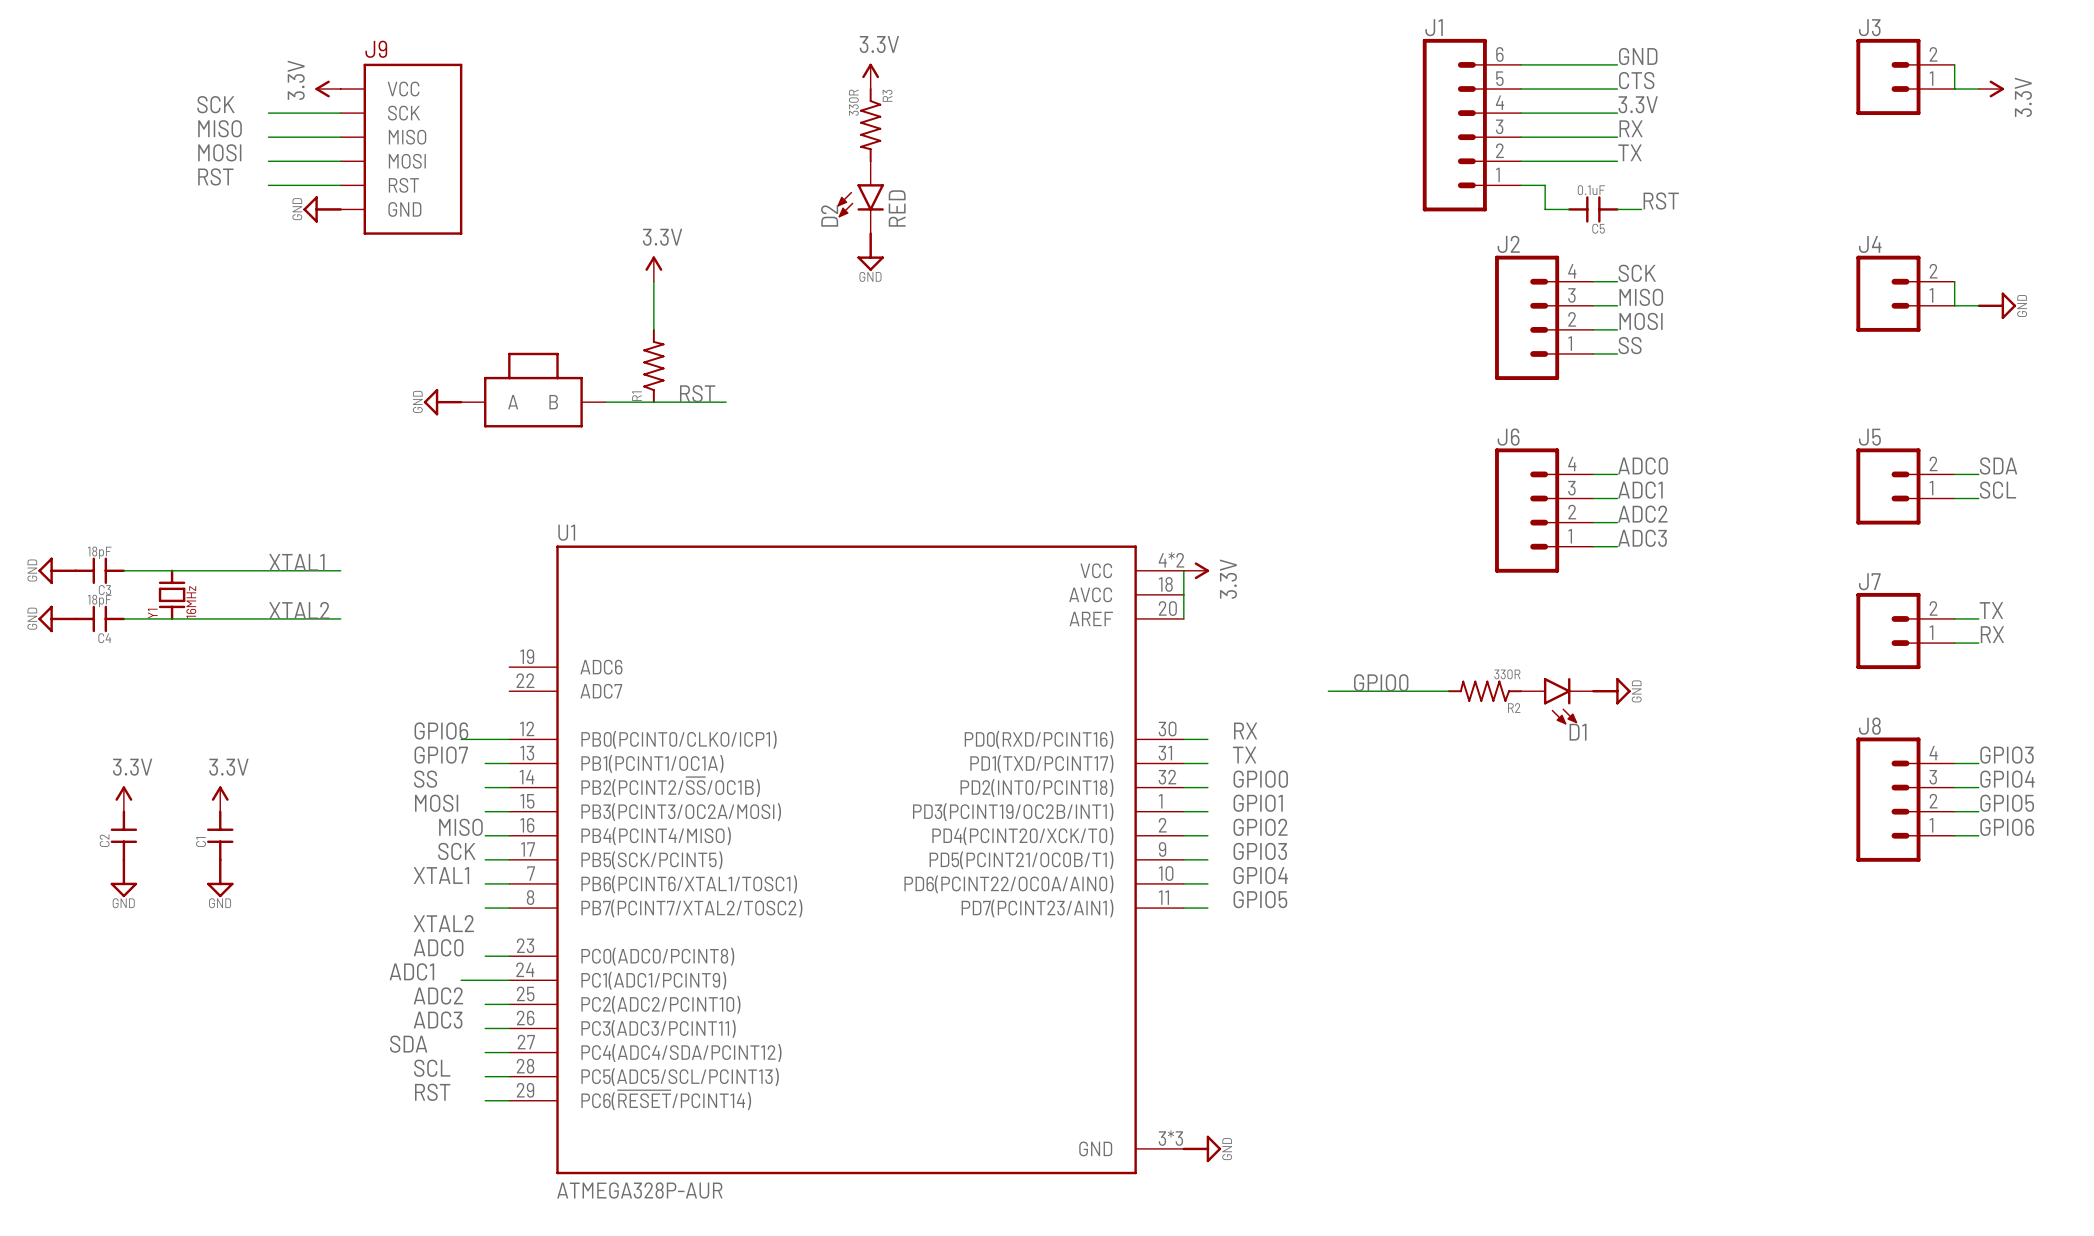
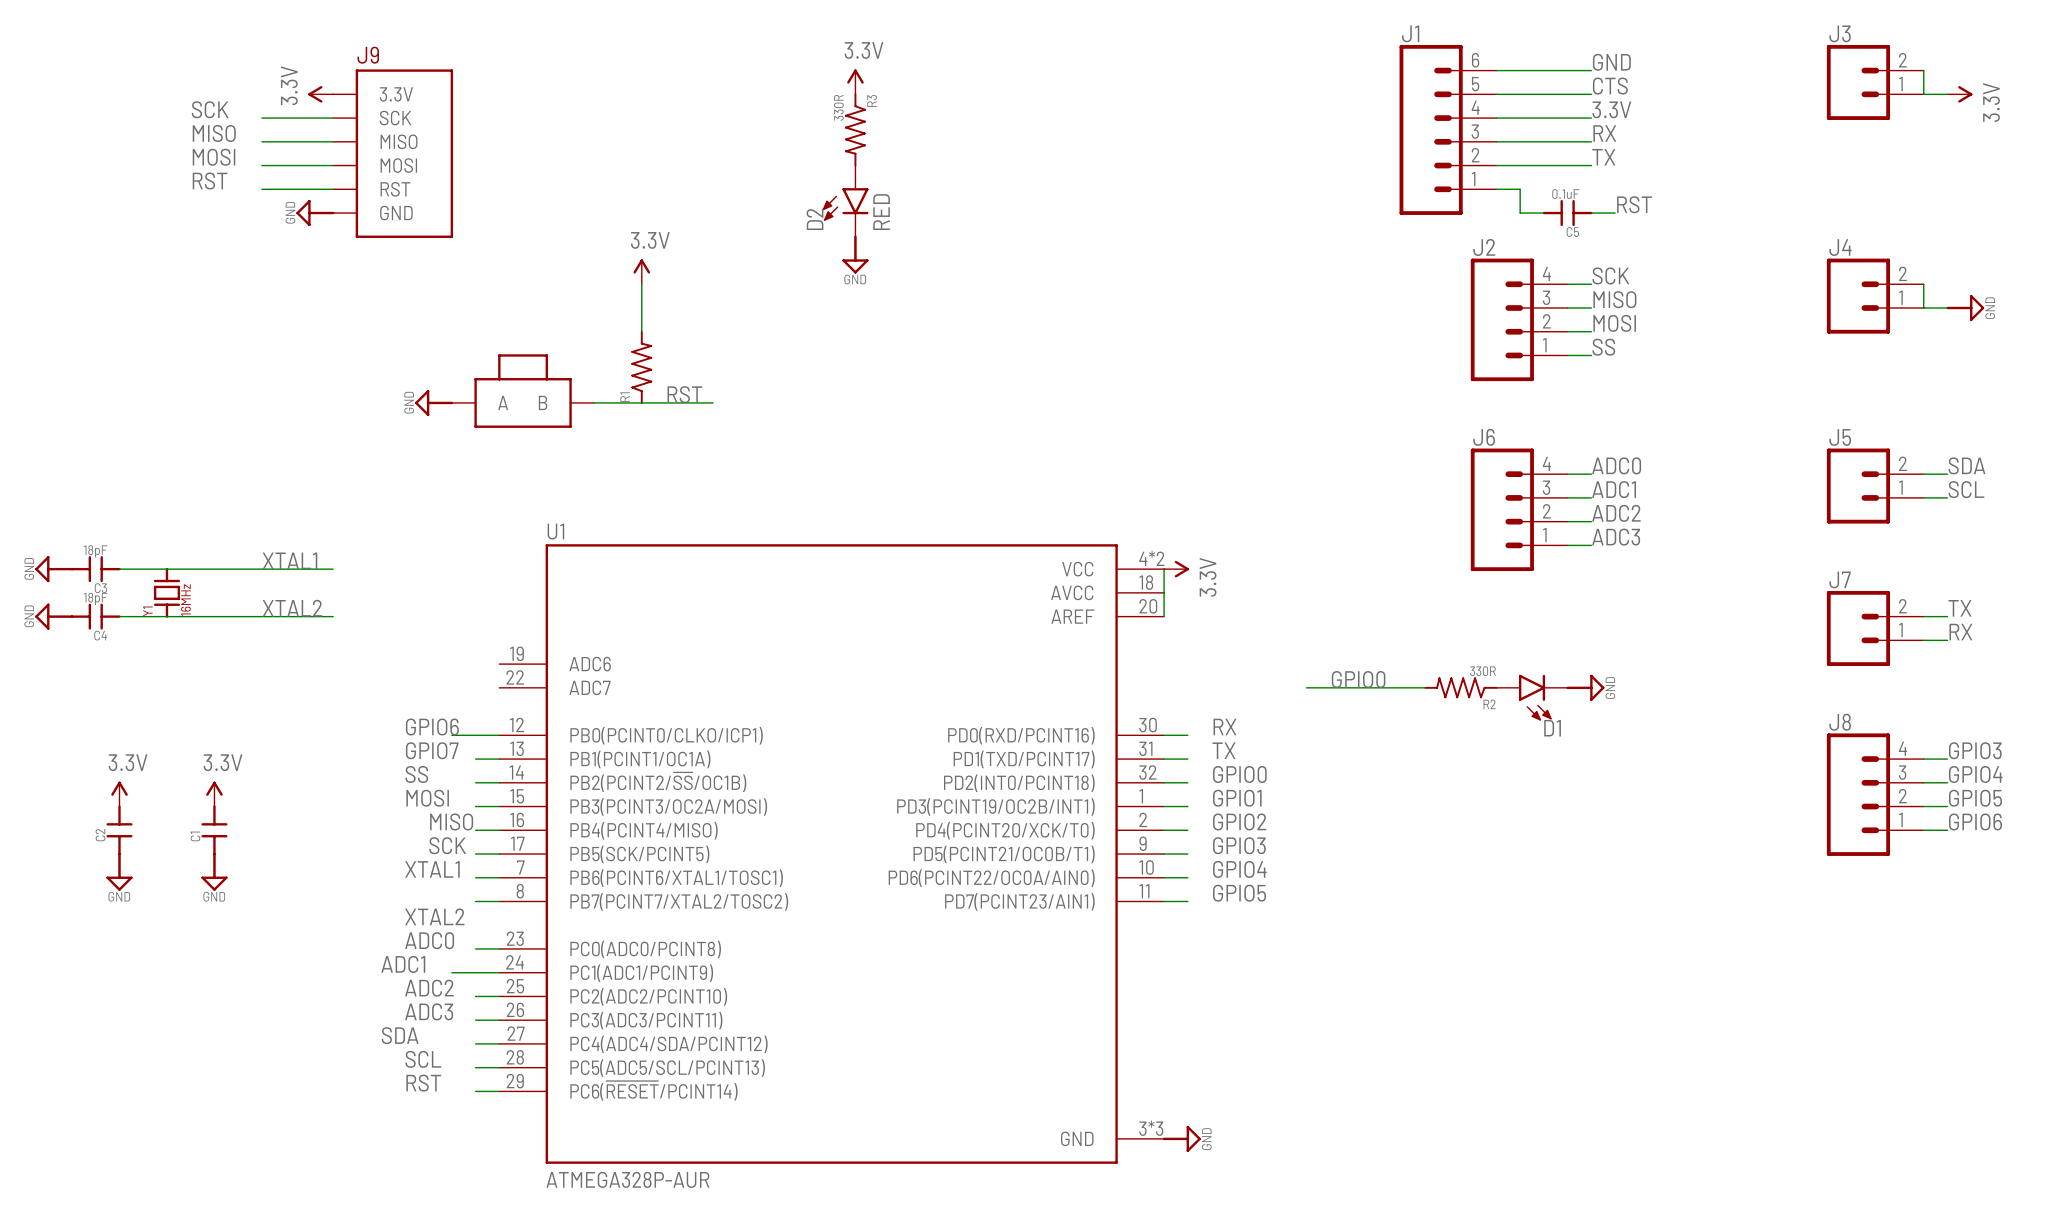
J9 pin name: VCC (403, 89) -> 3.3V (396, 94)

